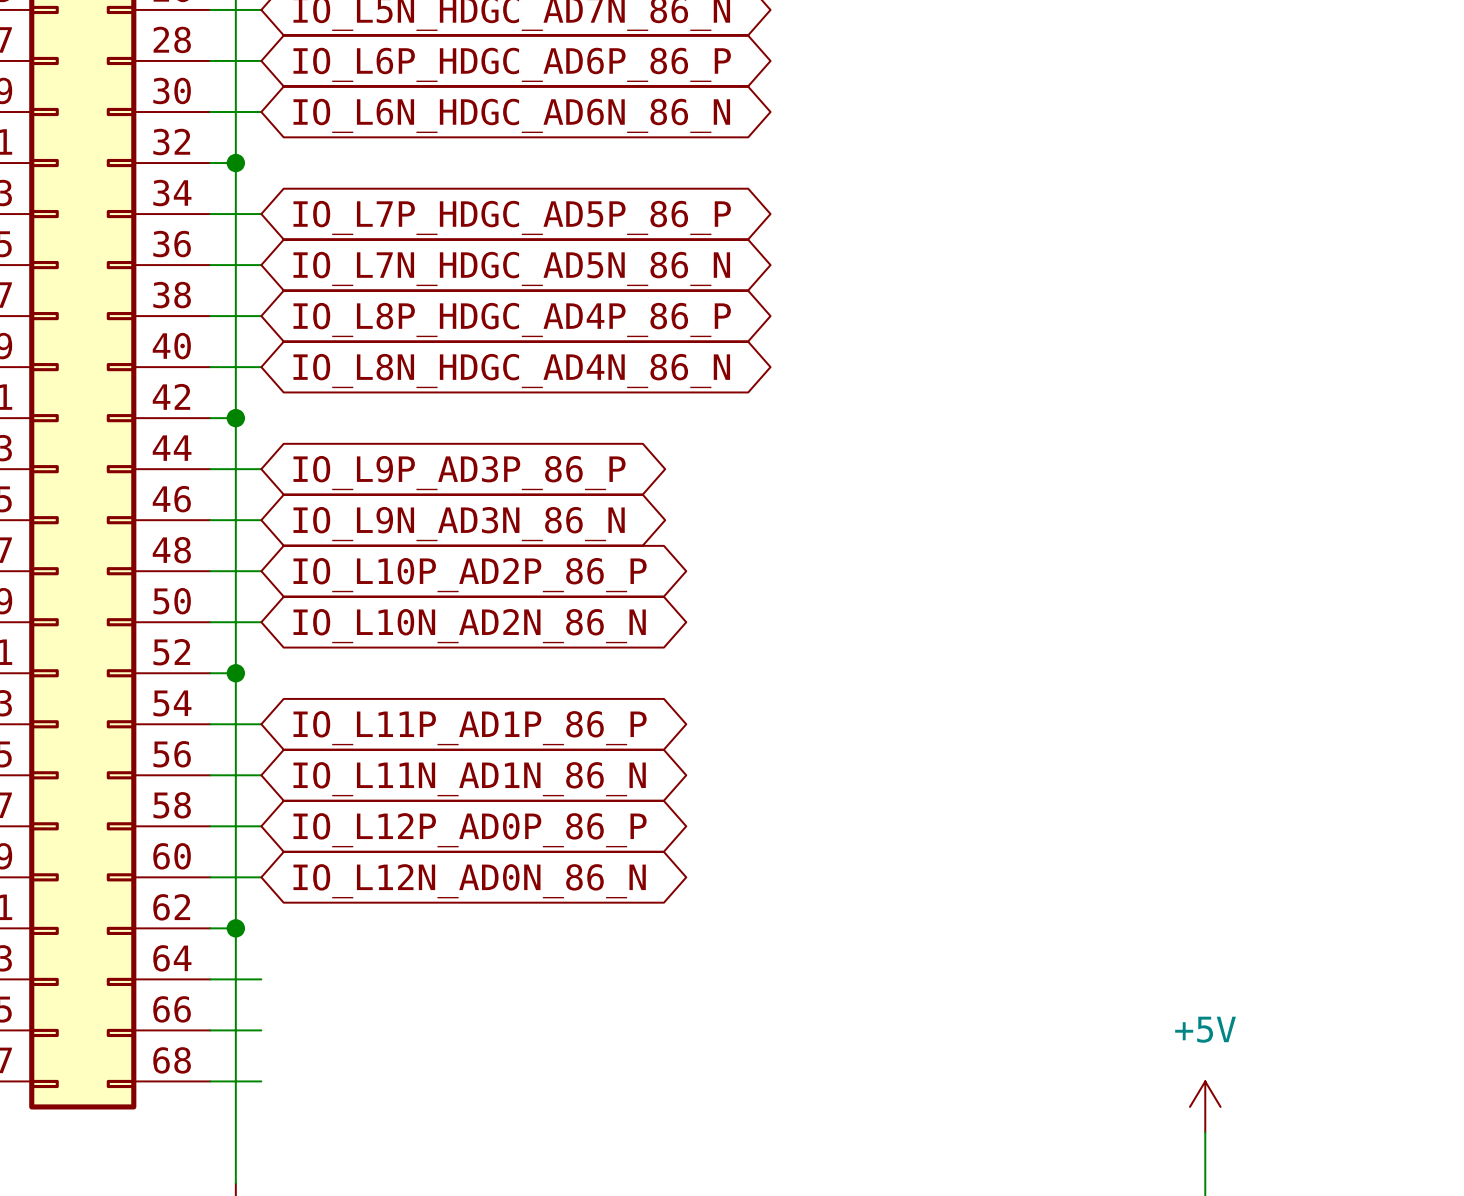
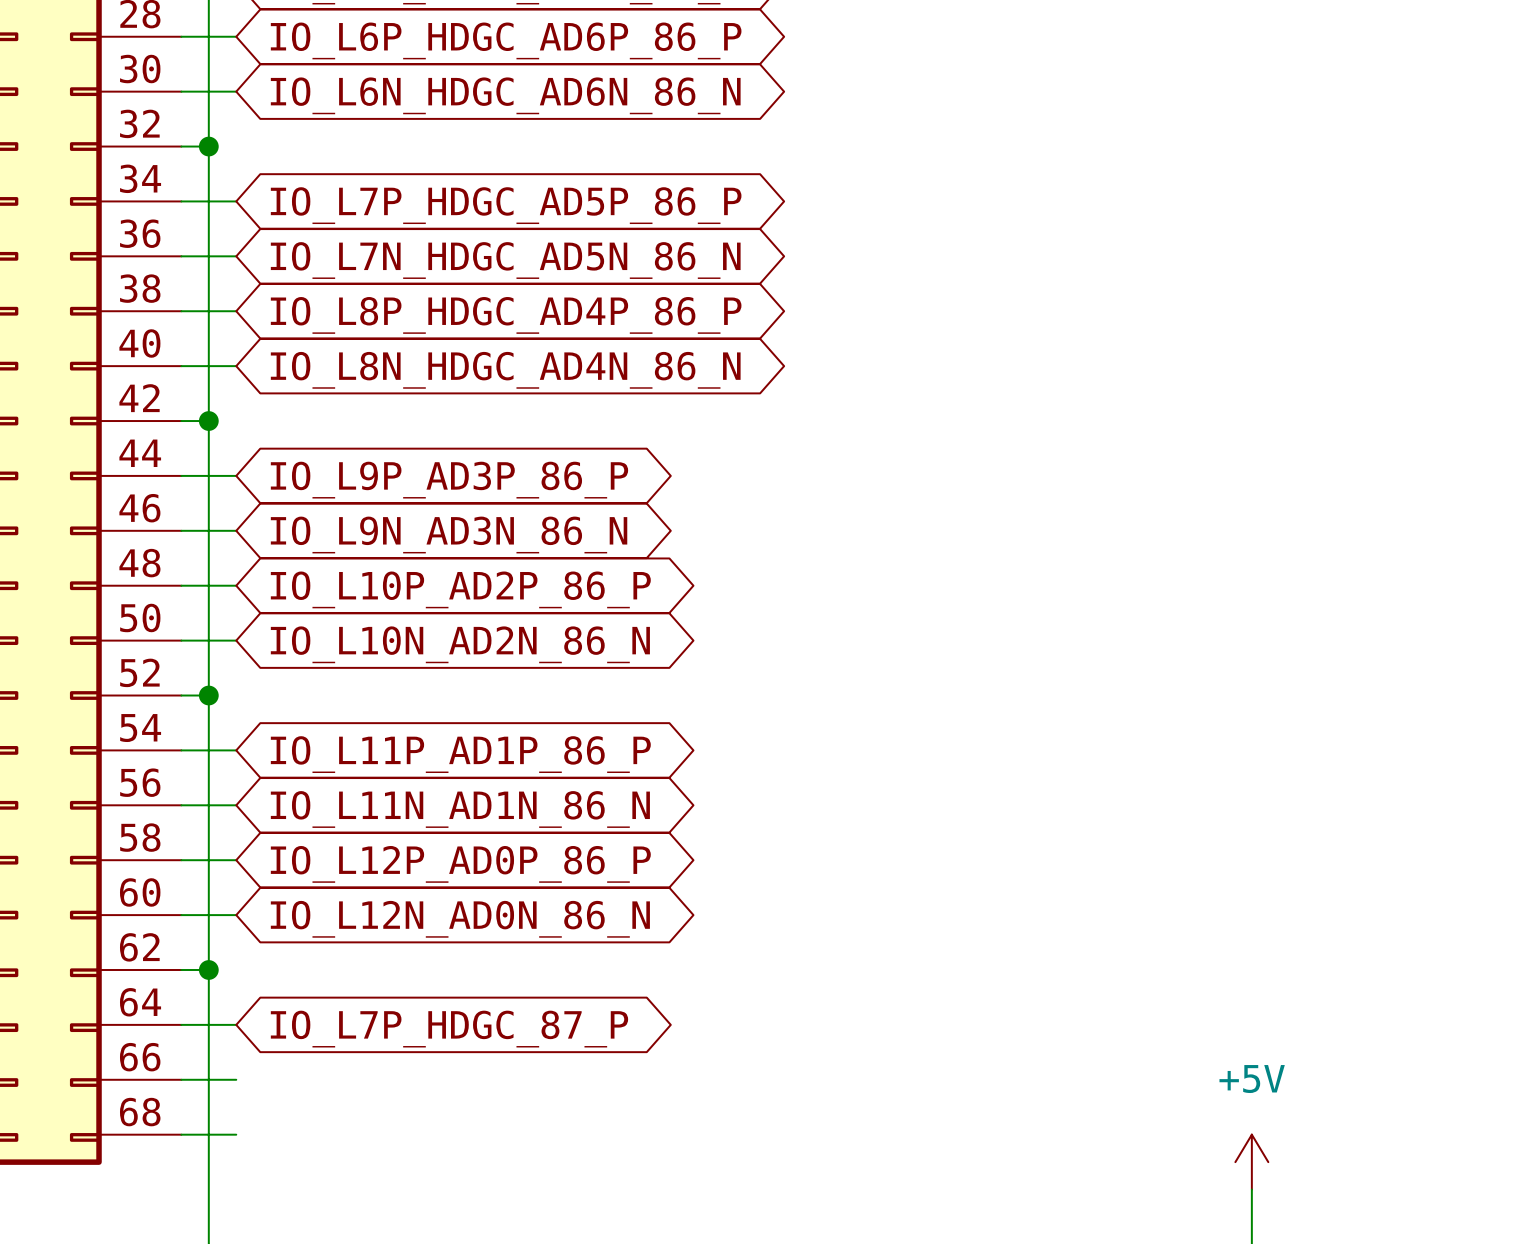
global label: none -> IO_L7P_HDGC_87_P (449, 1029)

